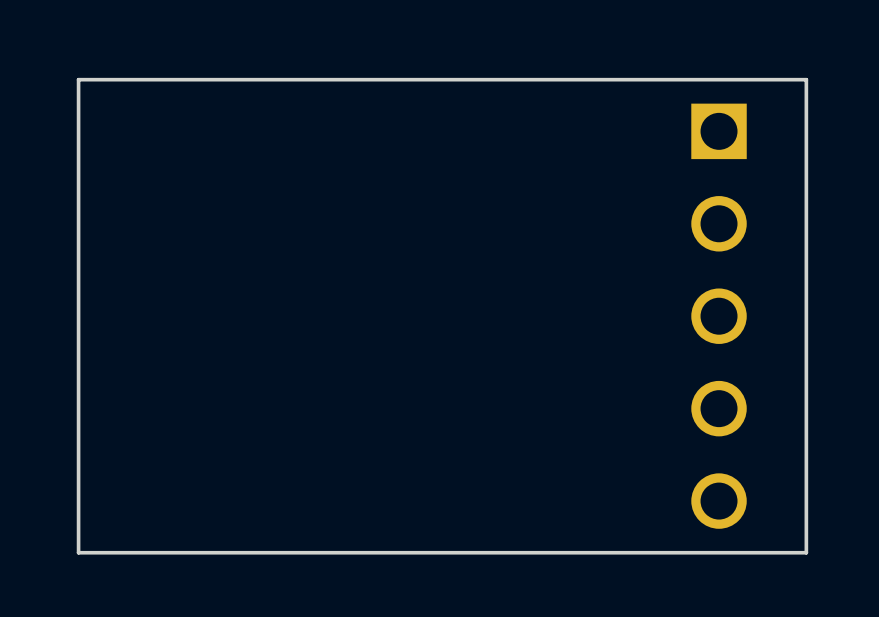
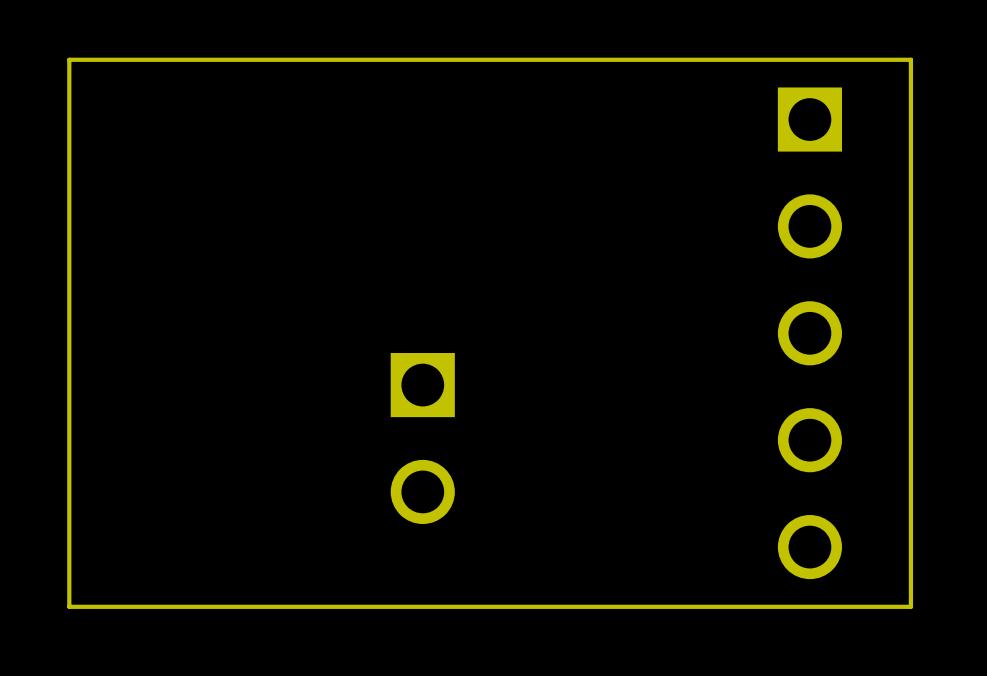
part: none -> (422, 438)

